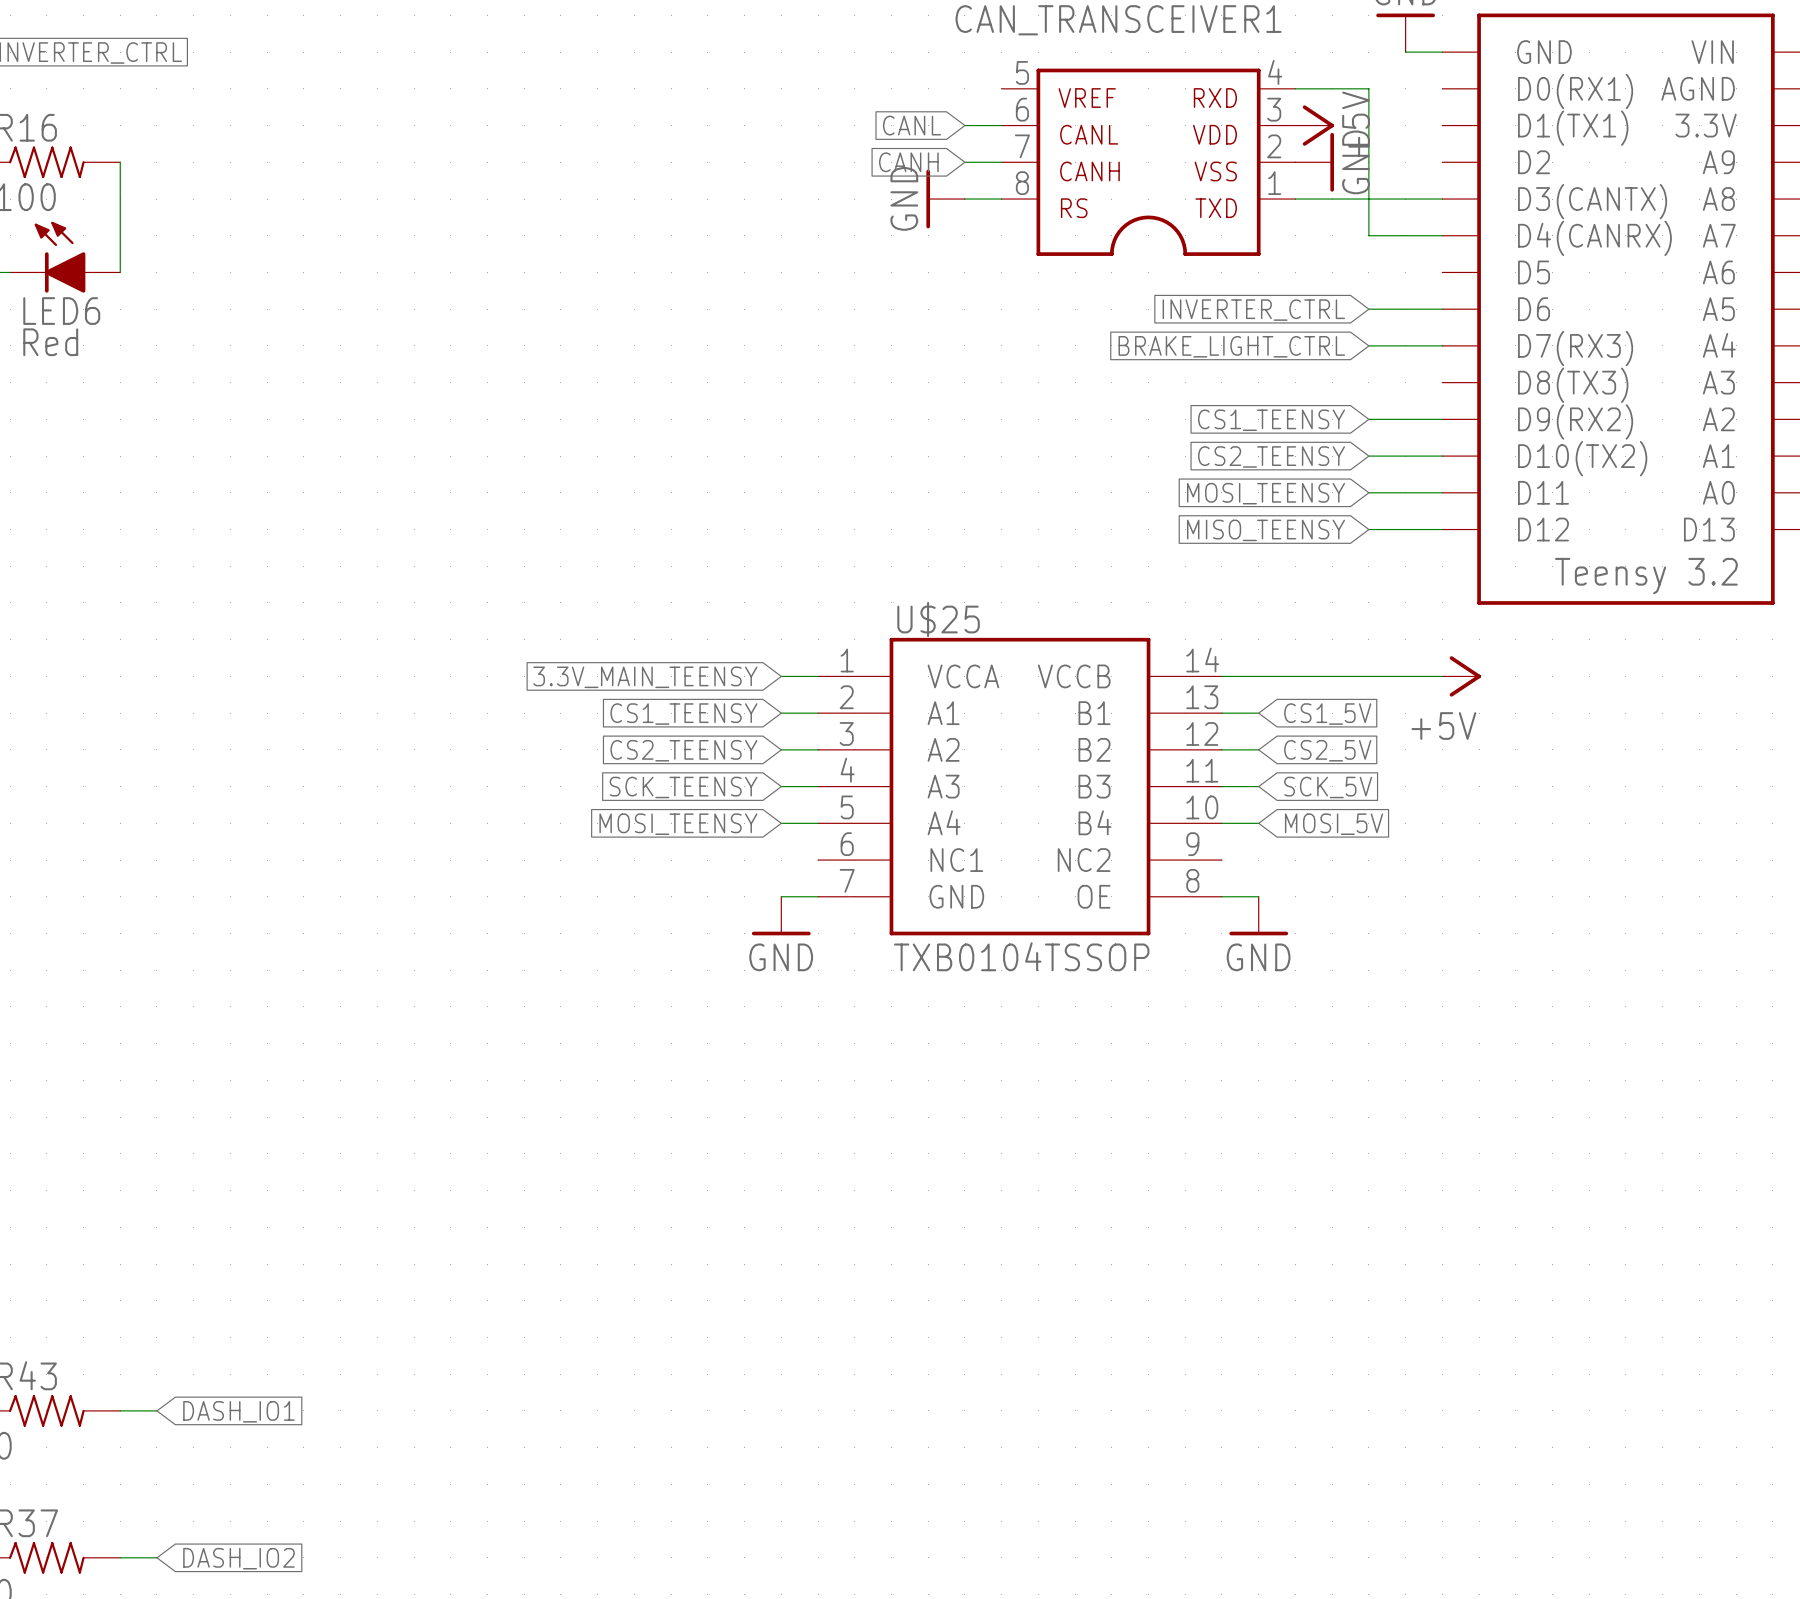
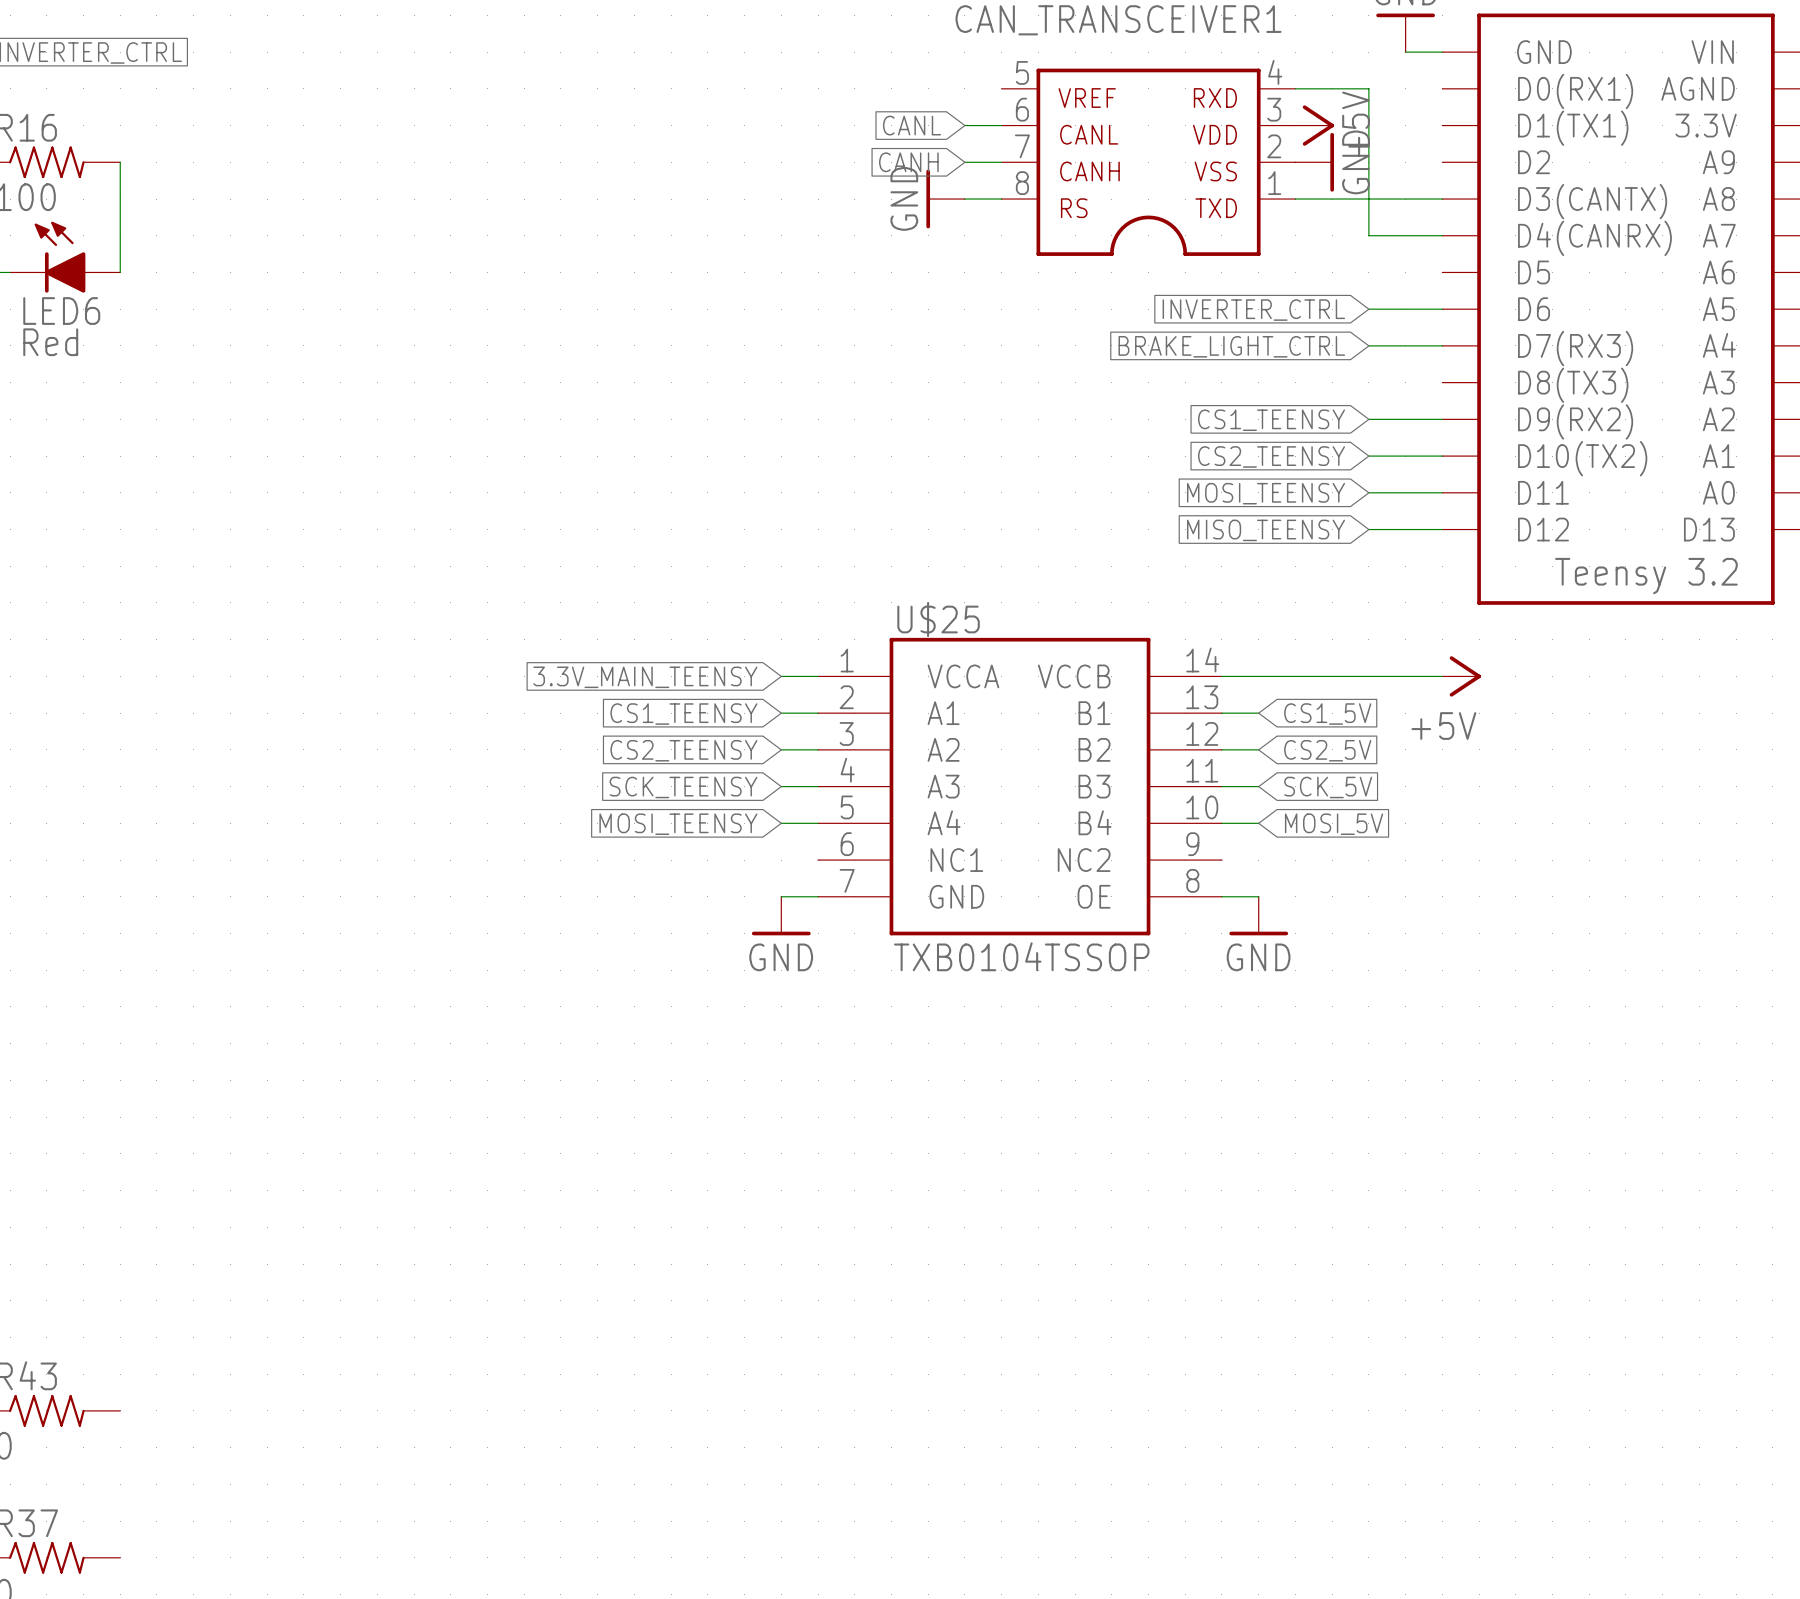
wire: (120, 1410) (156, 1410) -> none
global label: DASH_IO1 (239, 1411) -> none
wire: (120, 1557) (156, 1557) -> none
global label: DASH_IO2 (239, 1558) -> none

